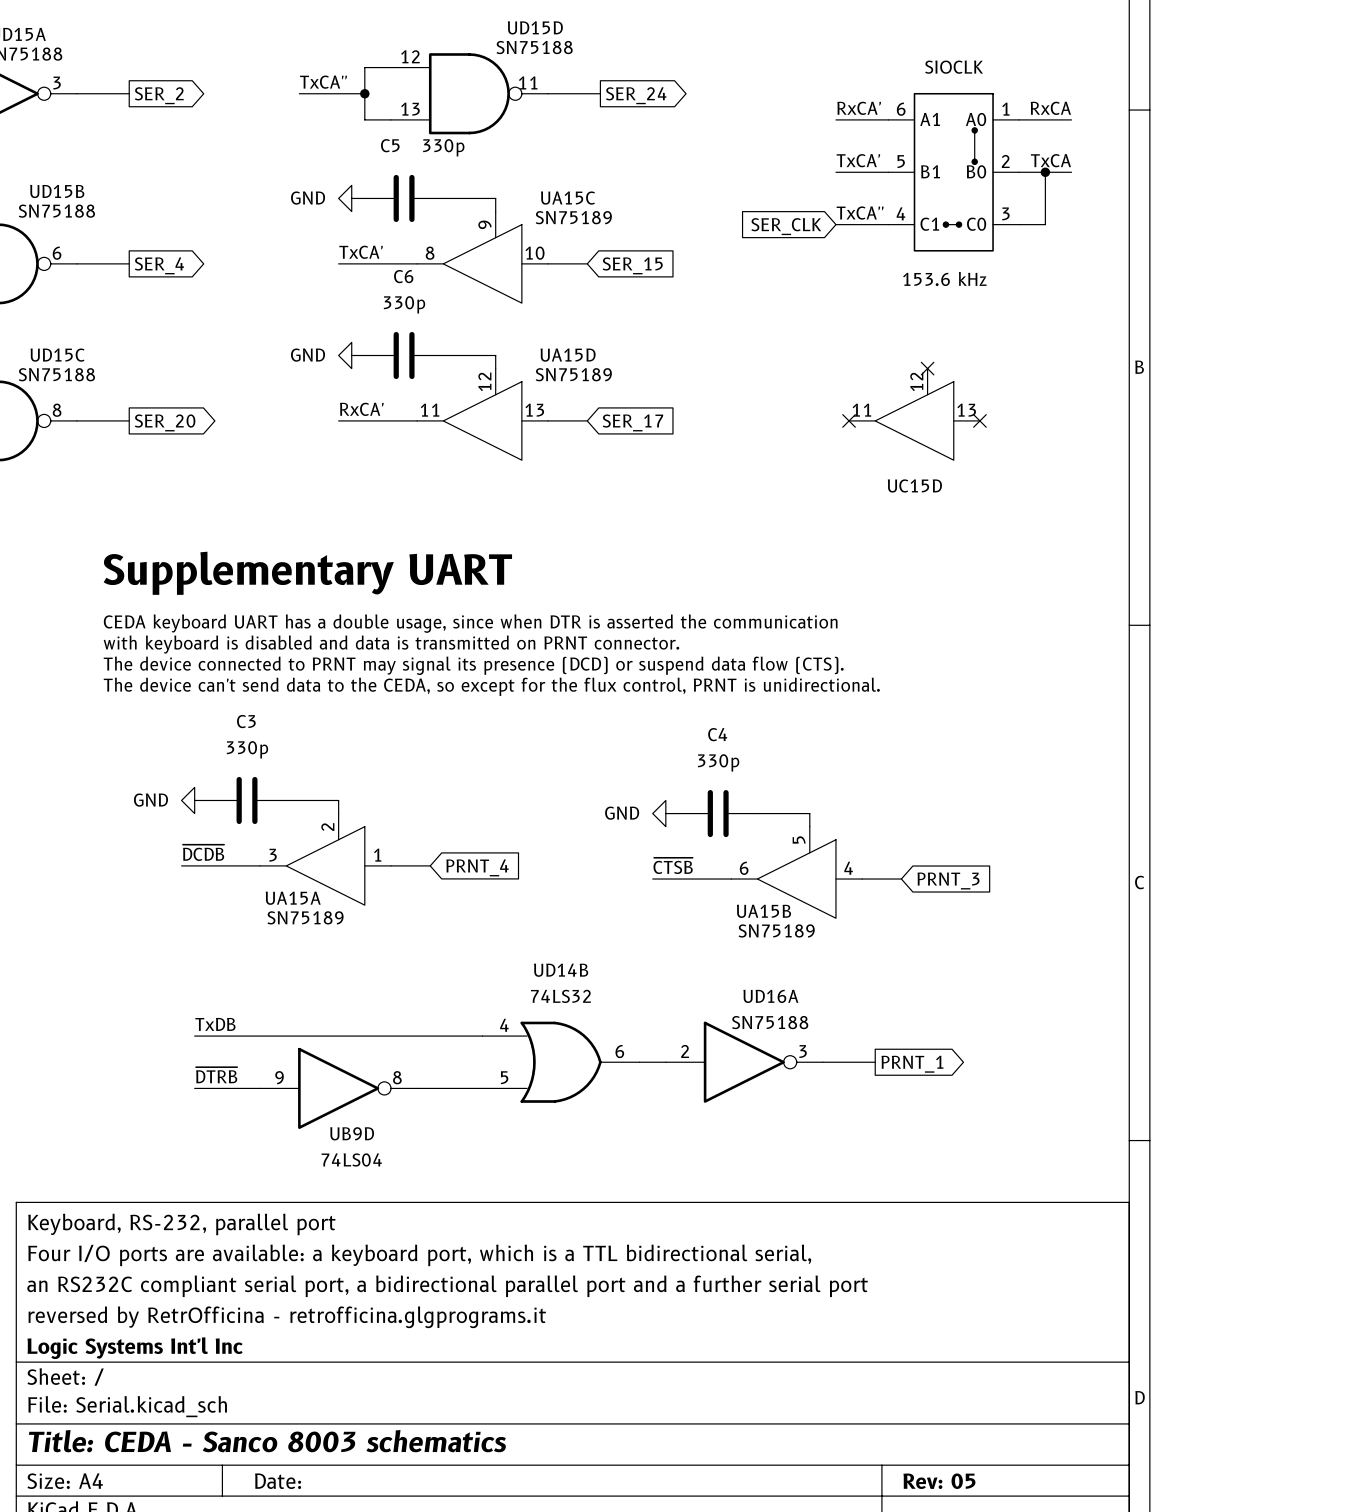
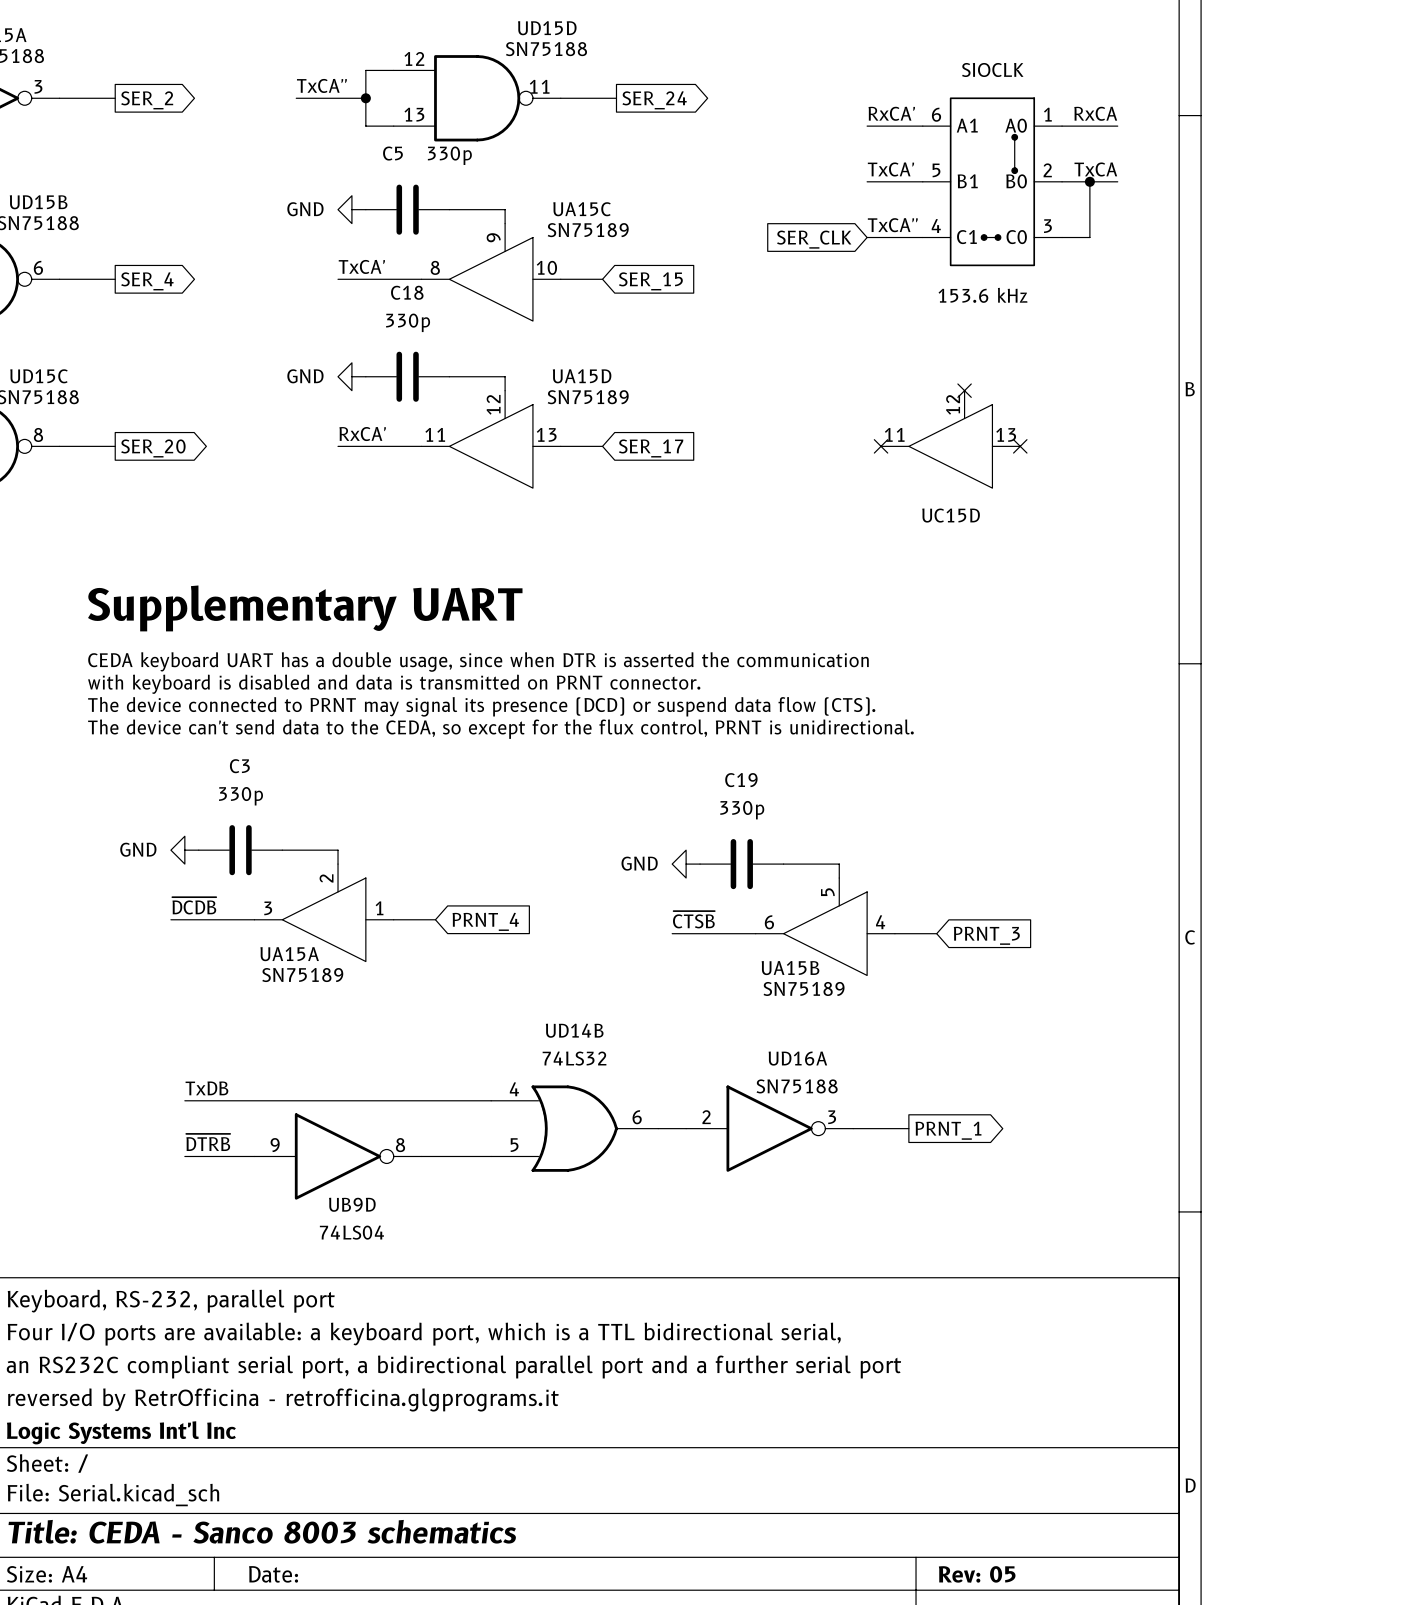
C6 name: C6 (403, 276) -> C18 (407, 292)
C4 name: C4 (717, 734) -> C19 (741, 780)

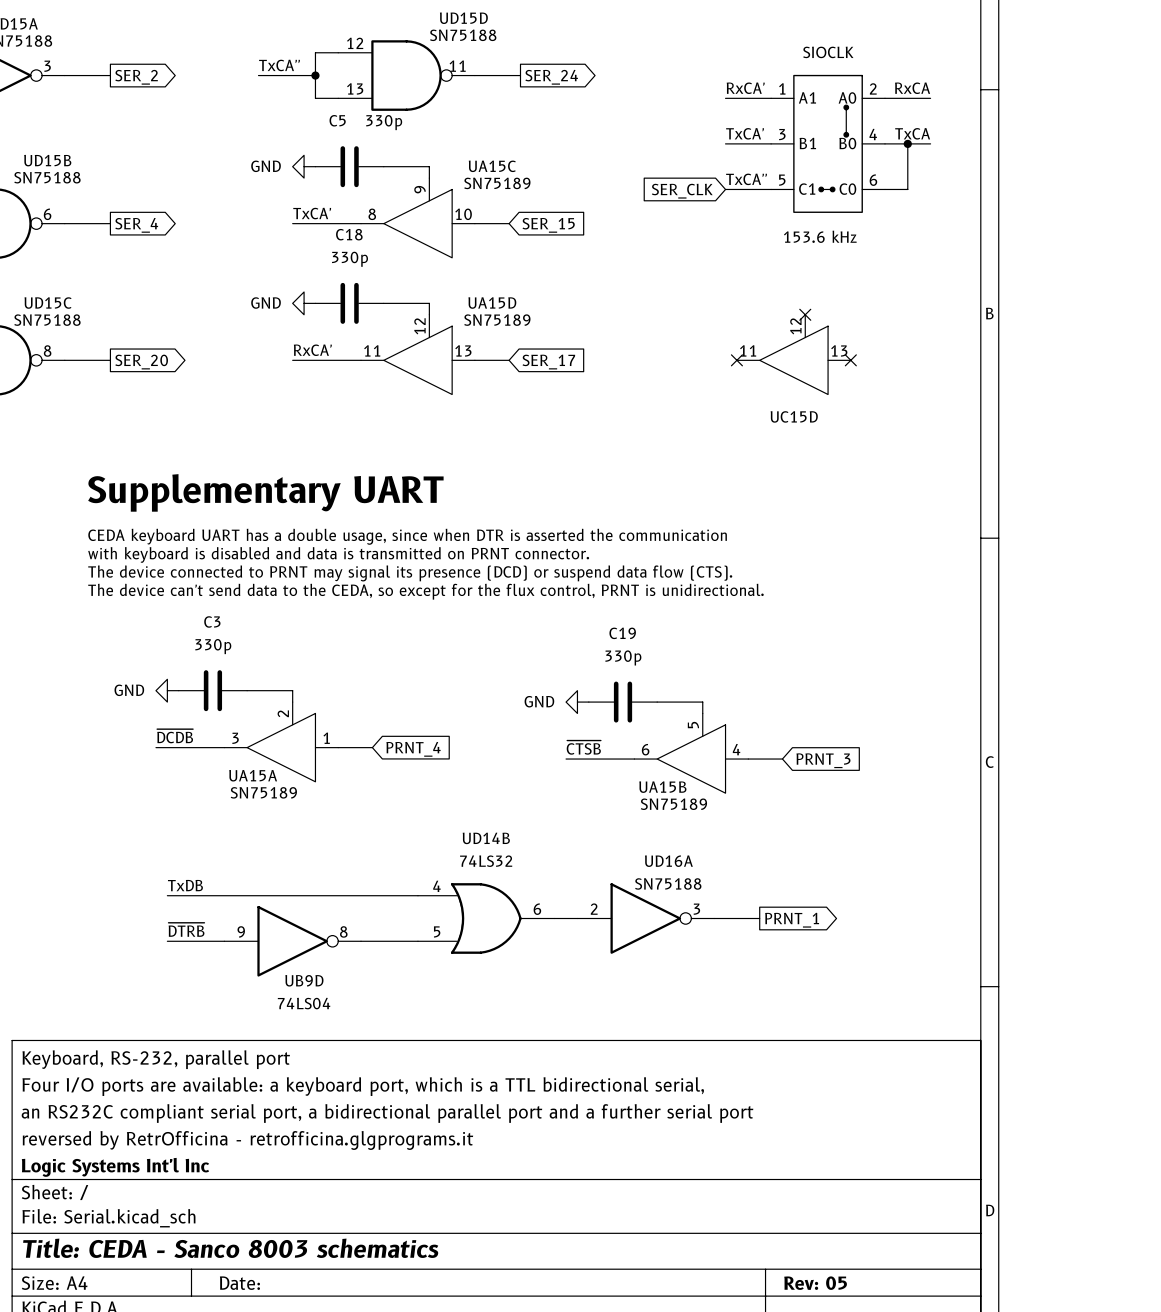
part pin number: 6 (936, 114) -> 1 (782, 88)
part pin number: 1 (1047, 114) -> 2 (873, 88)
part pin number: 5 (936, 170) -> 3 (782, 134)
part pin number: 2 (1047, 170) -> 4 (873, 134)
part pin number: 4 (936, 226) -> 5 (782, 180)
part pin number: 3 (1047, 226) -> 6 (873, 180)

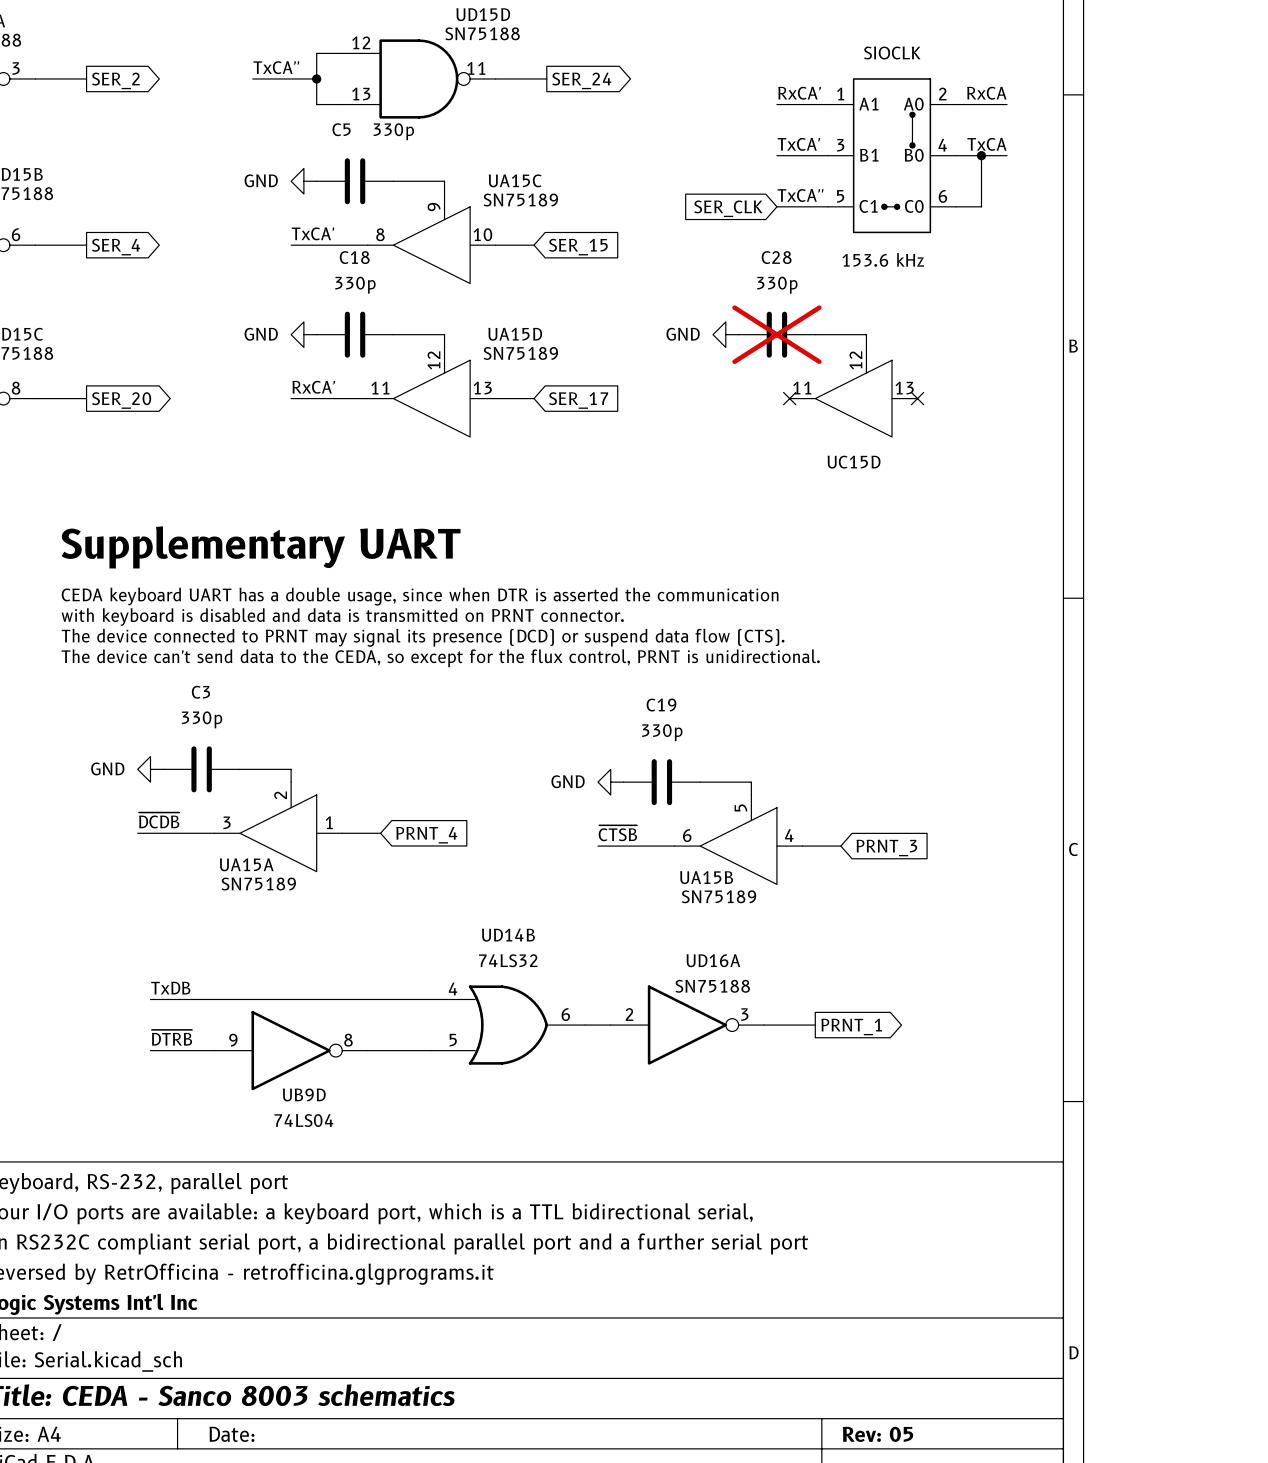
power symbol: none -> GND (725, 334)
C28: none -> 330p (776, 334)
wire: none -> (815, 334) (866, 334) (866, 347)
no-connect mark: (805, 314) -> none

